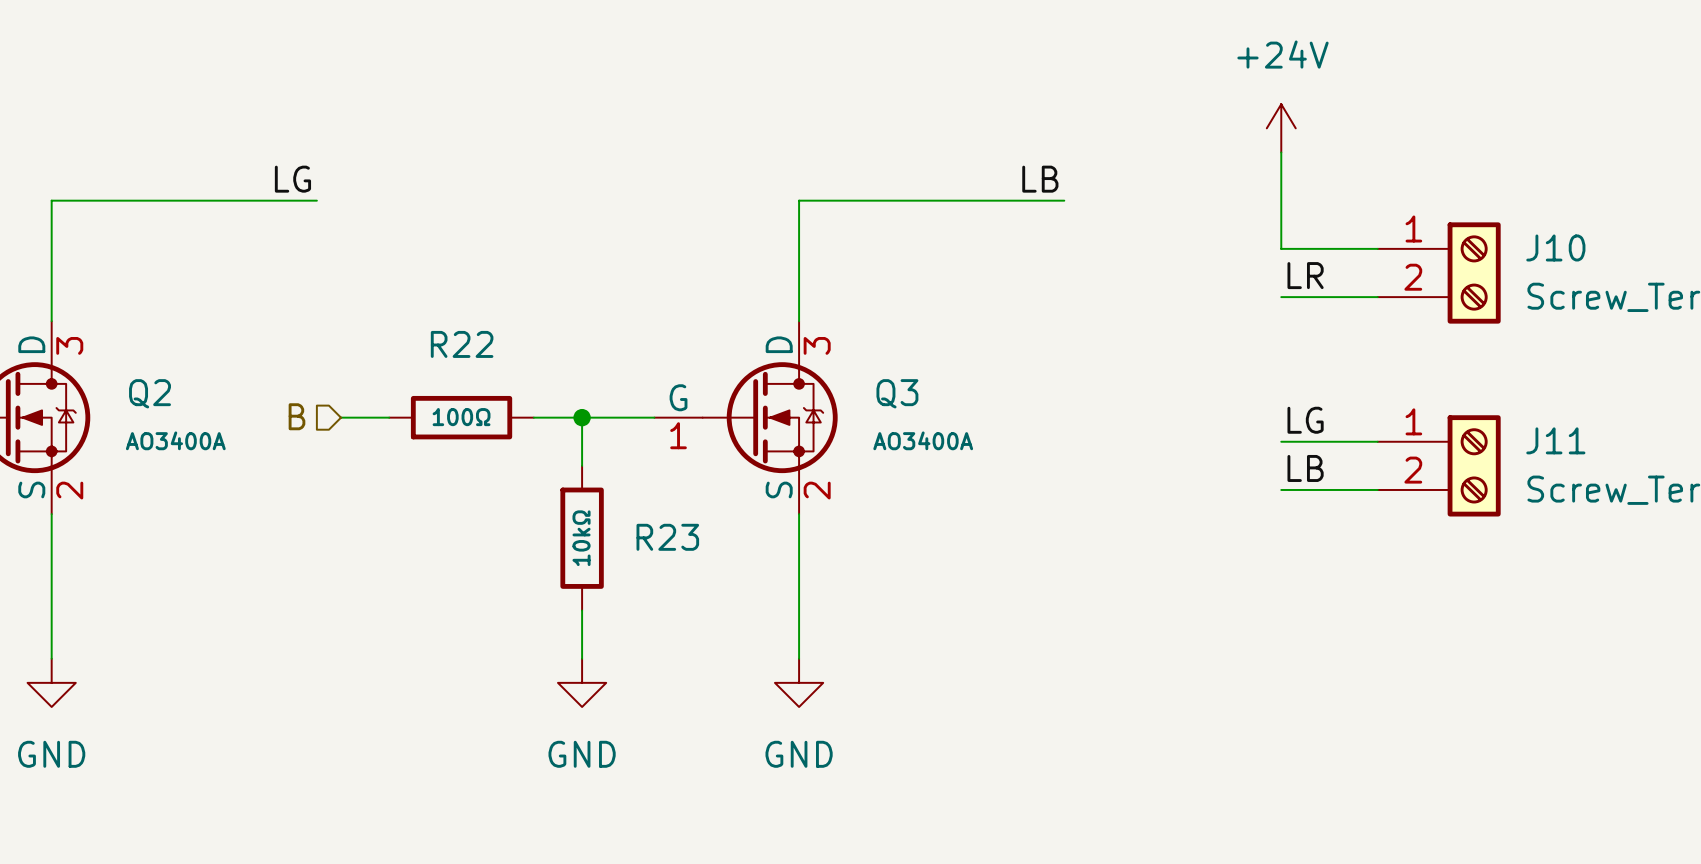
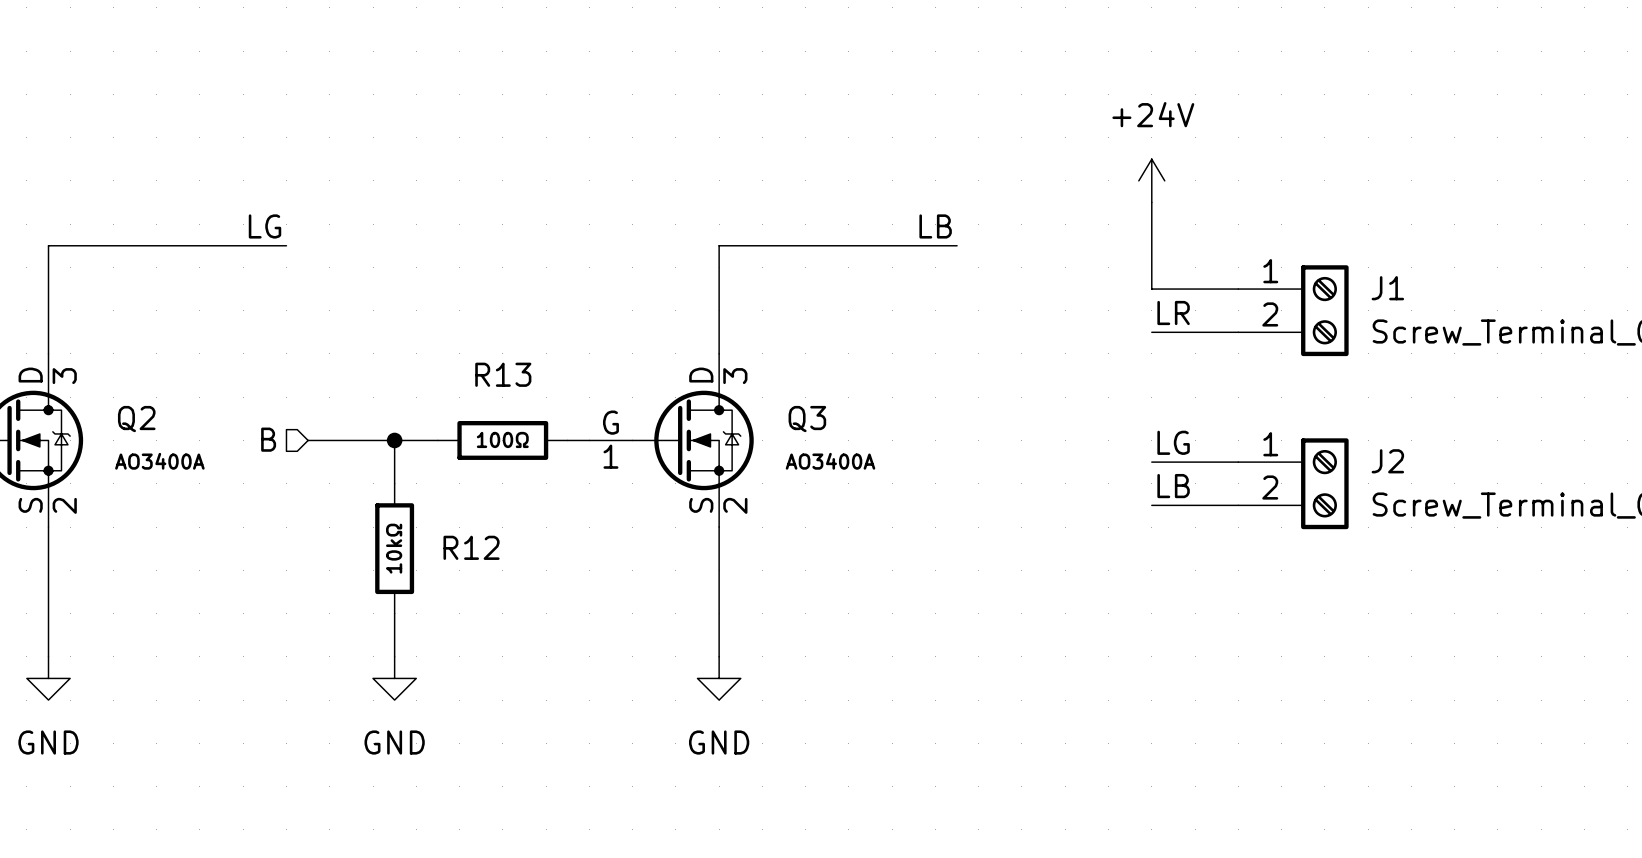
J10 name: J10 (1555, 247) -> J1 (1387, 288)
junction: none -> (394, 440)
R22: 100Ω (461, 417) -> none
wire: (533, 417) (630, 417) -> (351, 440) (437, 440)
R13: none -> 100Ω (502, 440)
wire: (582, 417) (582, 465) -> (394, 440) (394, 483)
junction: (582, 417) -> none
J11 name: J11 (1555, 440) -> J2 (1387, 461)
R12: none -> 10kΩ (394, 548)
R23: 10kΩ (582, 538) -> none
wire: (582, 610) (582, 658) -> (394, 613) (394, 656)
power symbol position: GND (582, 682) -> GND (394, 678)

